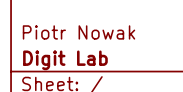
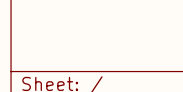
title block: Piotr Nowak (79, 32) -> none
title block: Digit Lab (65, 60) -> none

